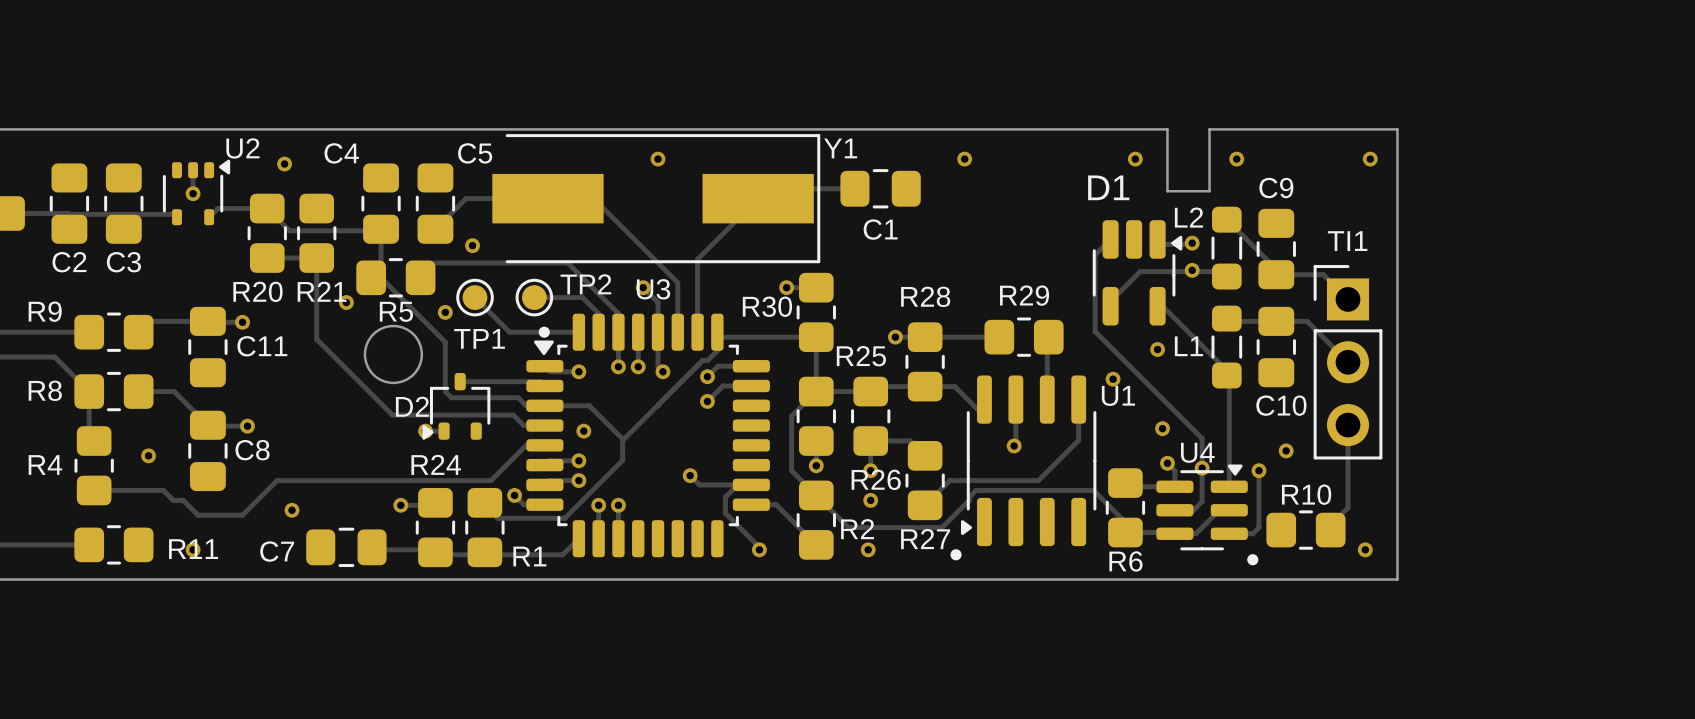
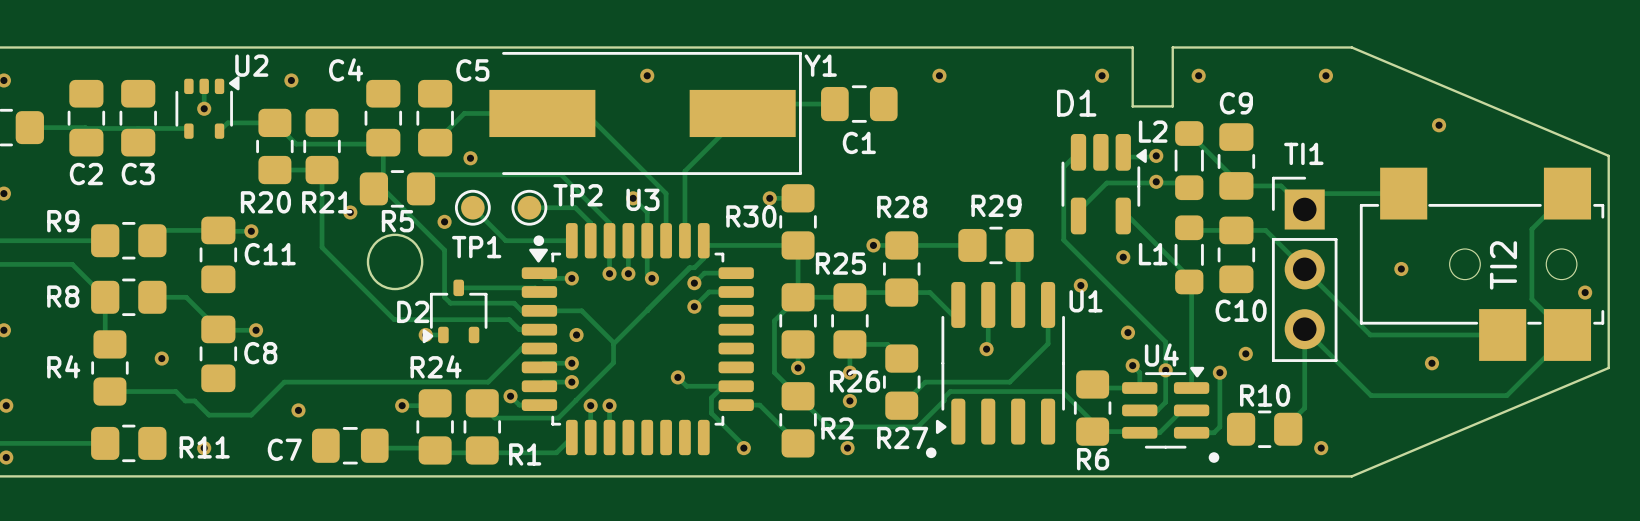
board edge: (1397, 129) (1397, 579) -> (1351, 47) (1608, 155) (1608, 367) (1351, 476)
via: none -> (1439, 125)
track: none -> (1403, 193) (1320, 193) (1304, 209)
track: none -> (1567, 193) (1531, 229) (1531, 299) (1567, 334) (1506, 395) (1371, 395) (1304, 329)
TI2: none -> (1482, 264)
via: none -> (1401, 269)
track: none -> (1304, 269) (1370, 334) (1502, 334)
via: none -> (1585, 292)
via: none -> (1431, 363)

